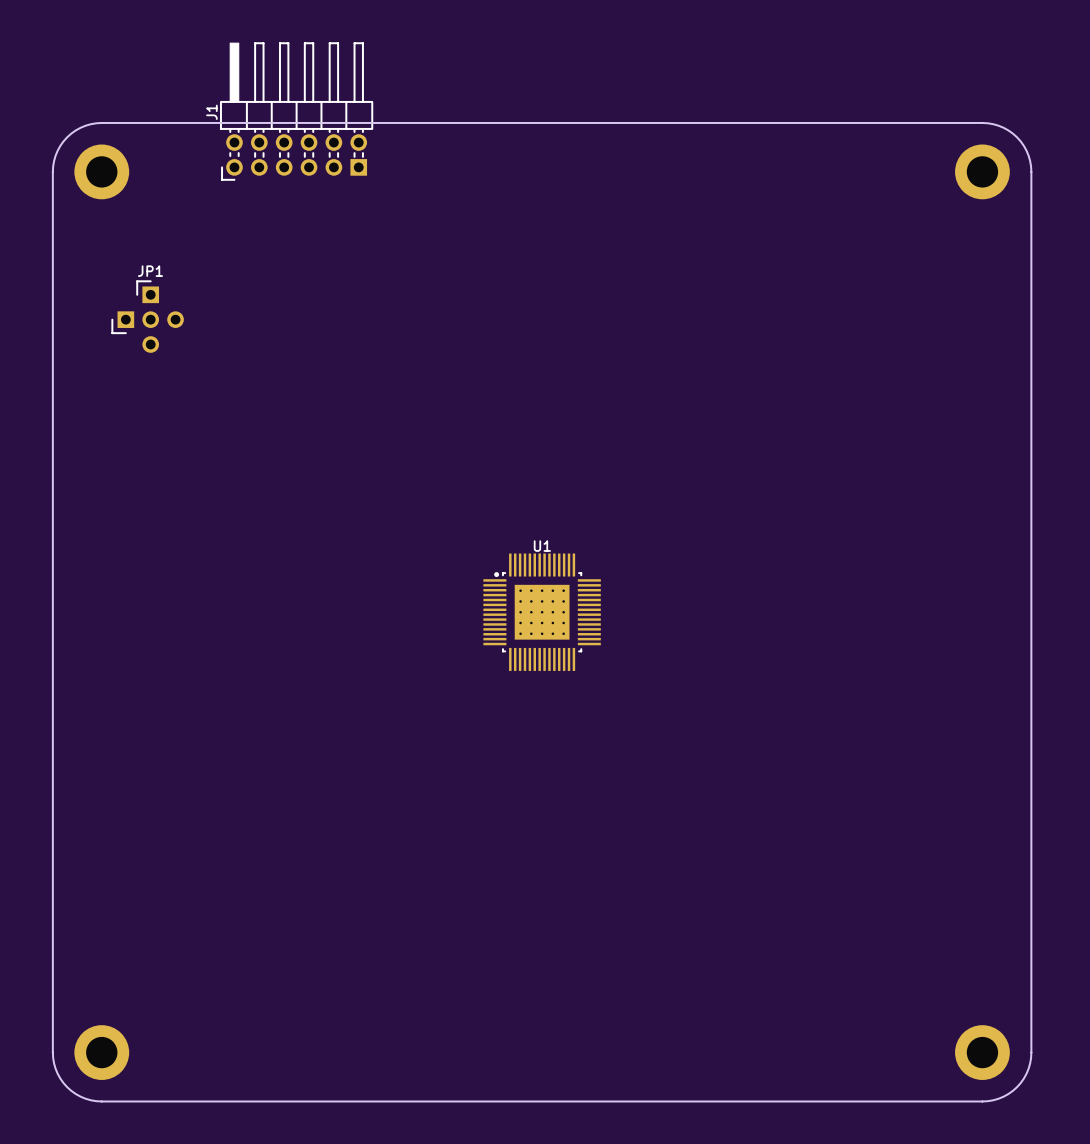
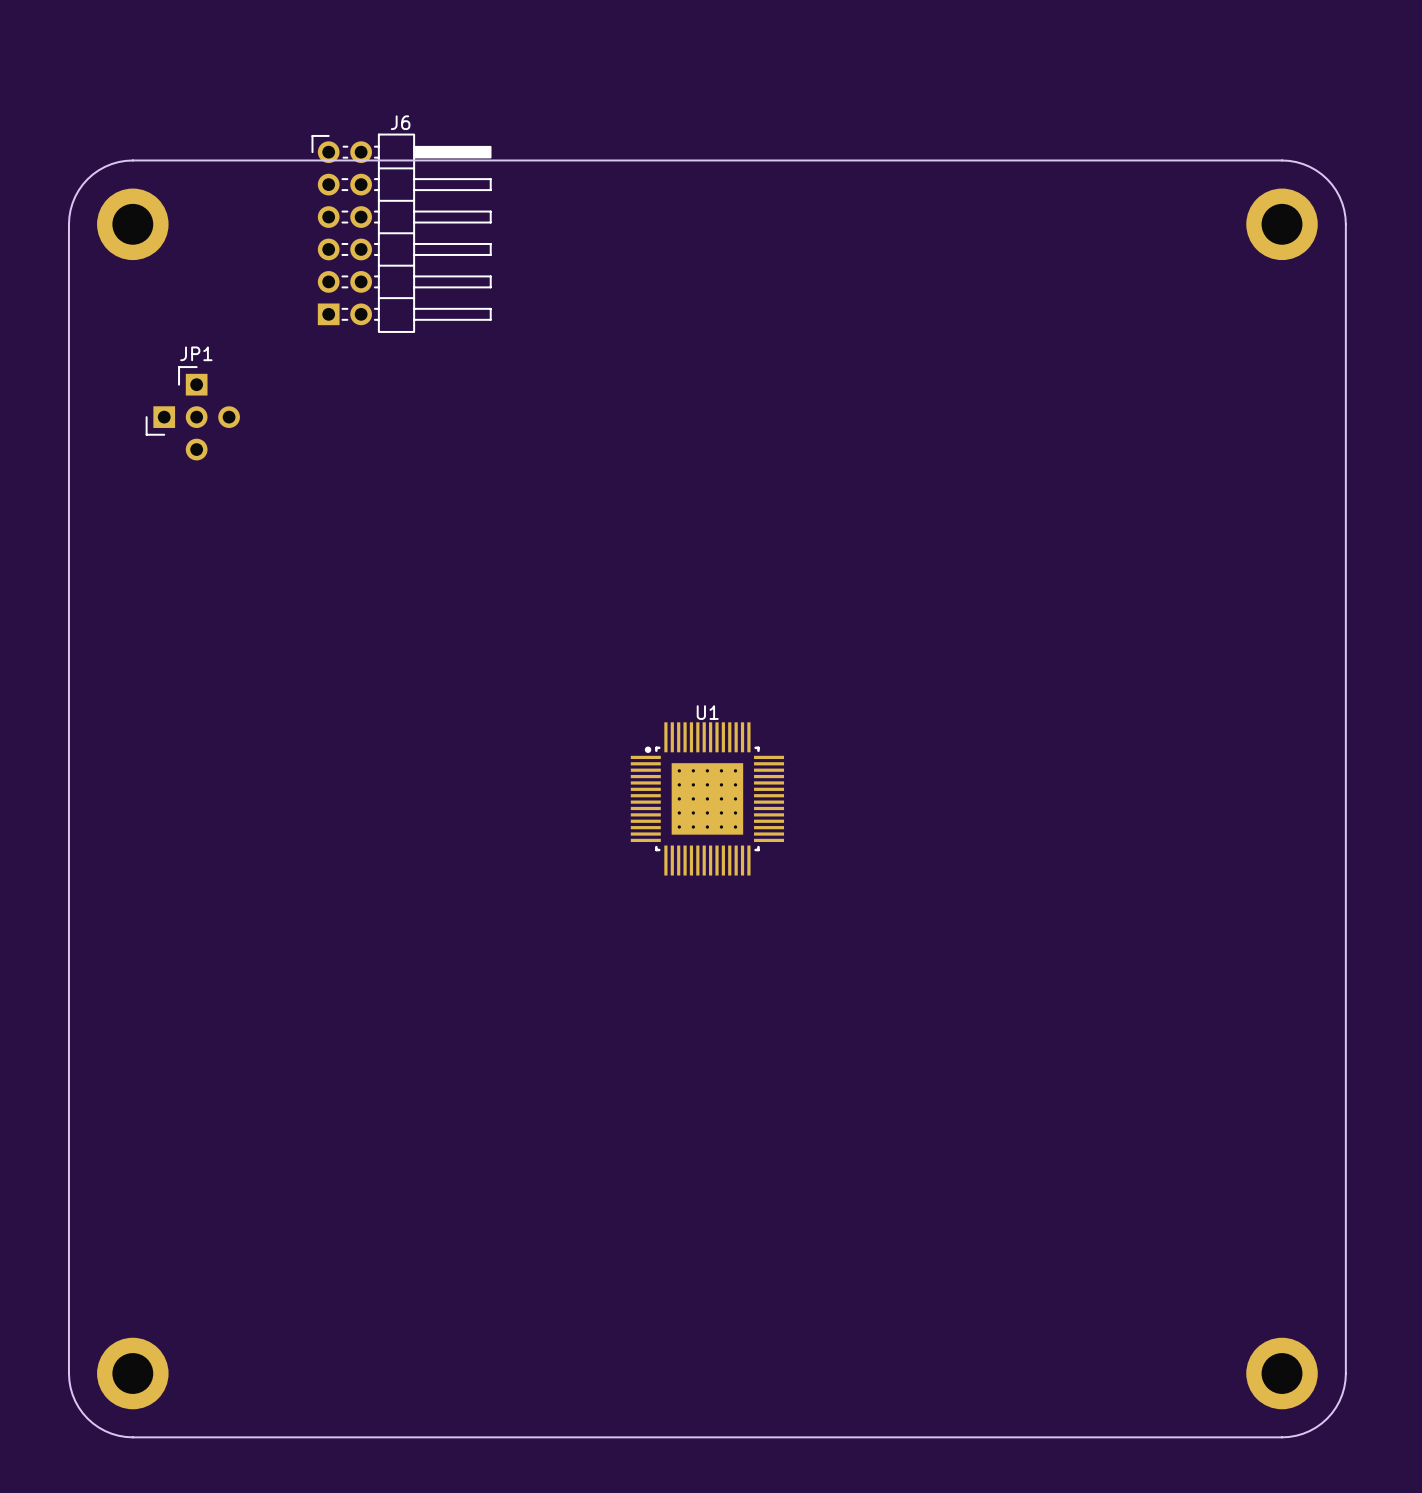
J1: (296, 111) -> none
J6: none -> (401, 233)

